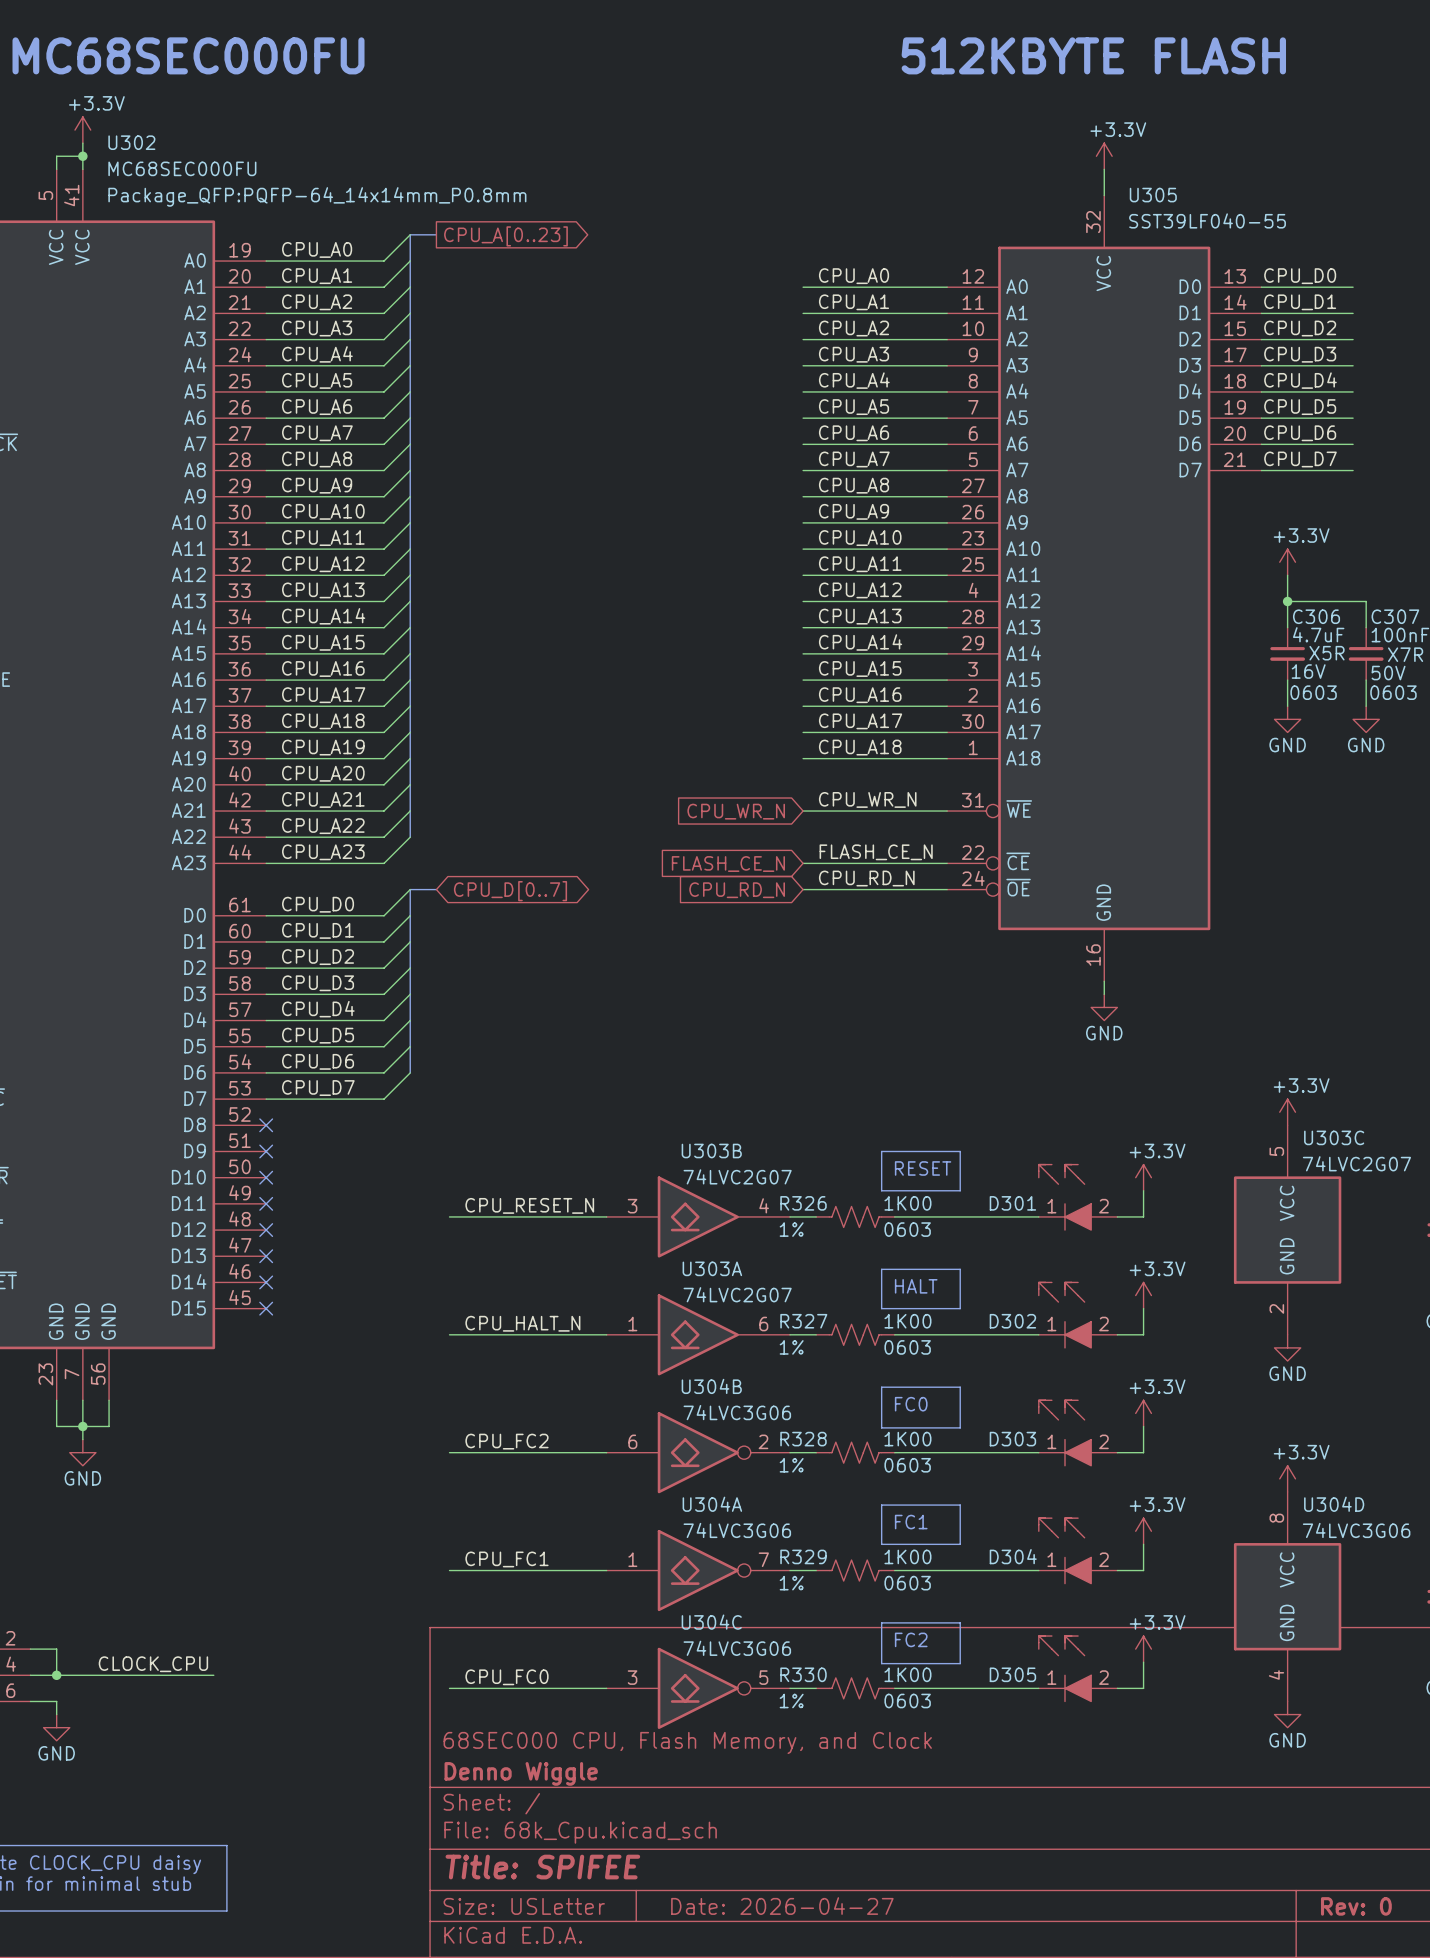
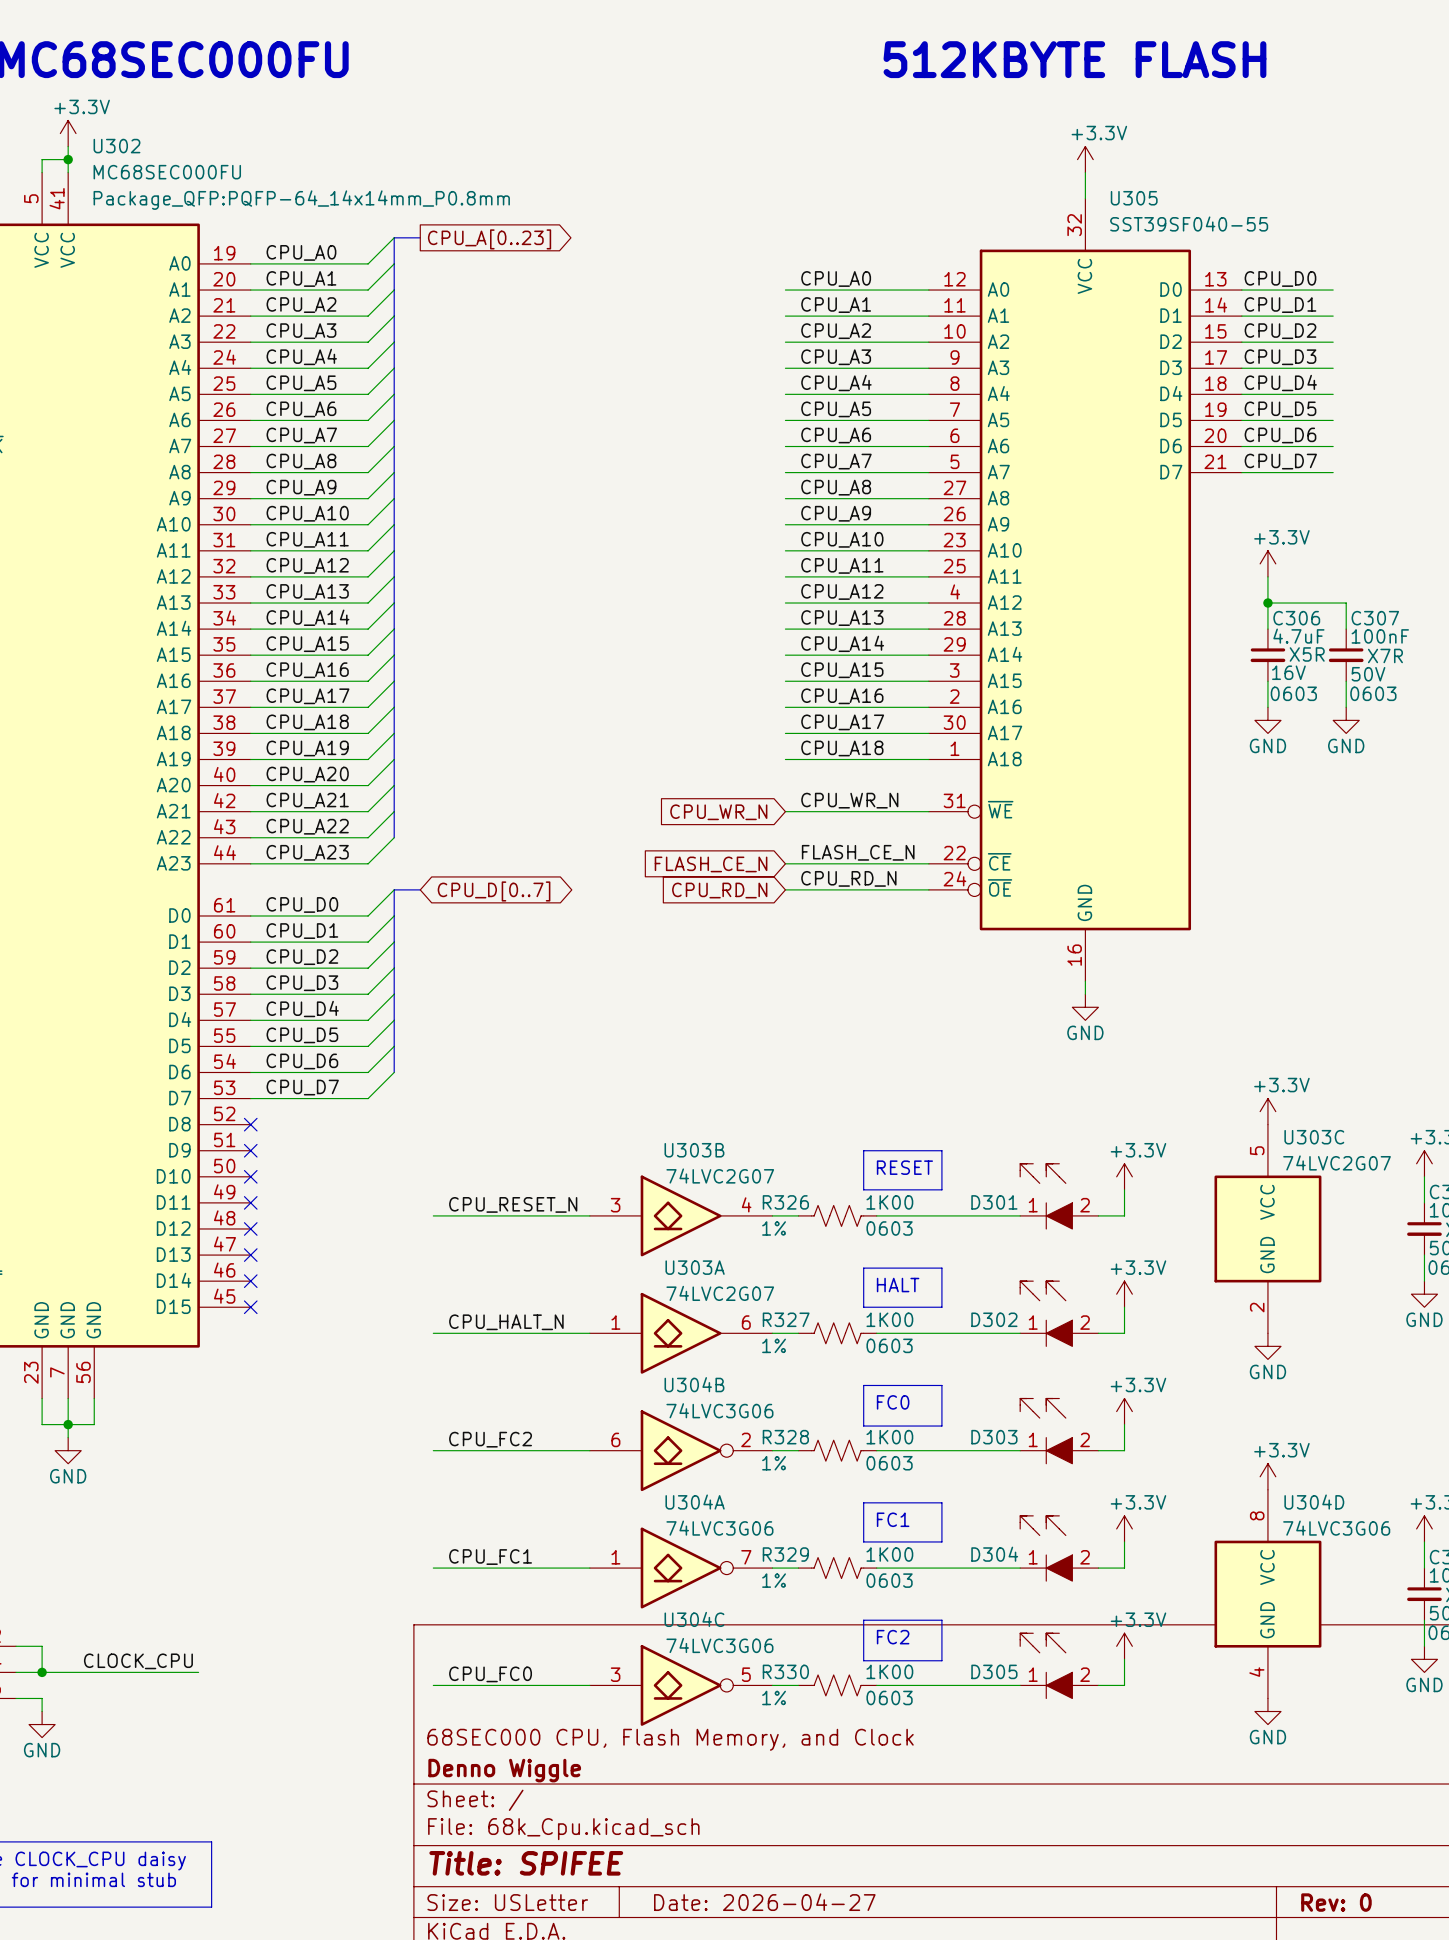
U305 value: SST39LF040-55 (1207, 220) -> SST39SF040-55 (1189, 224)

